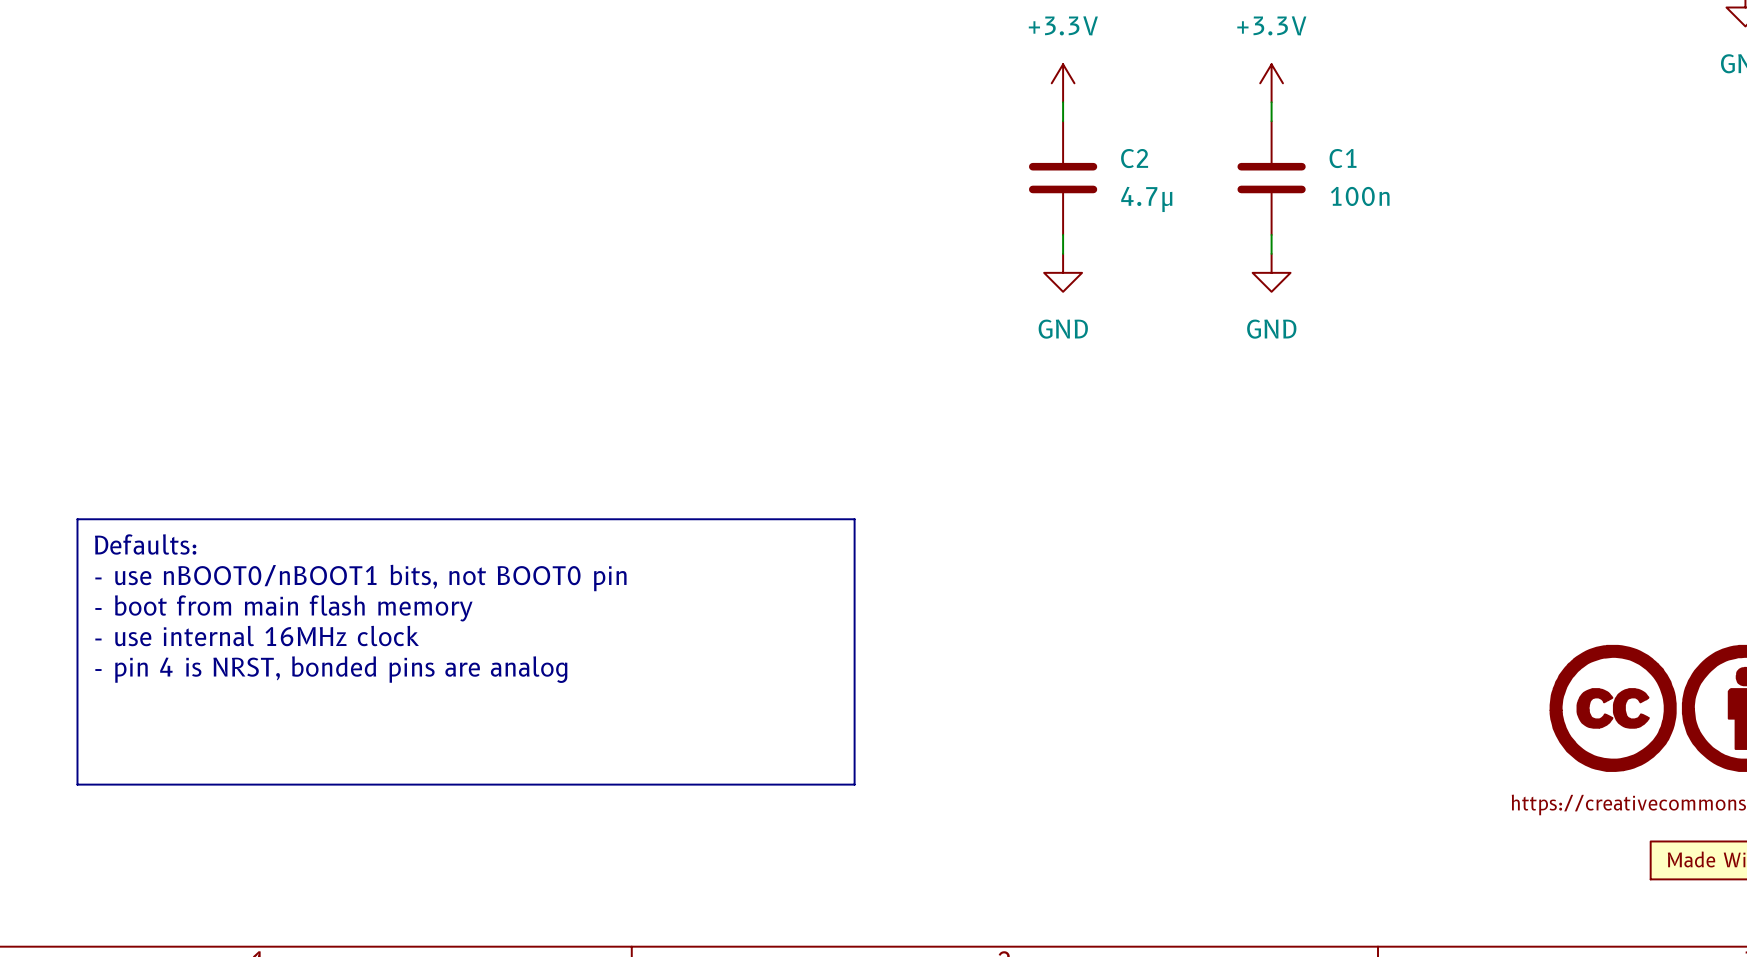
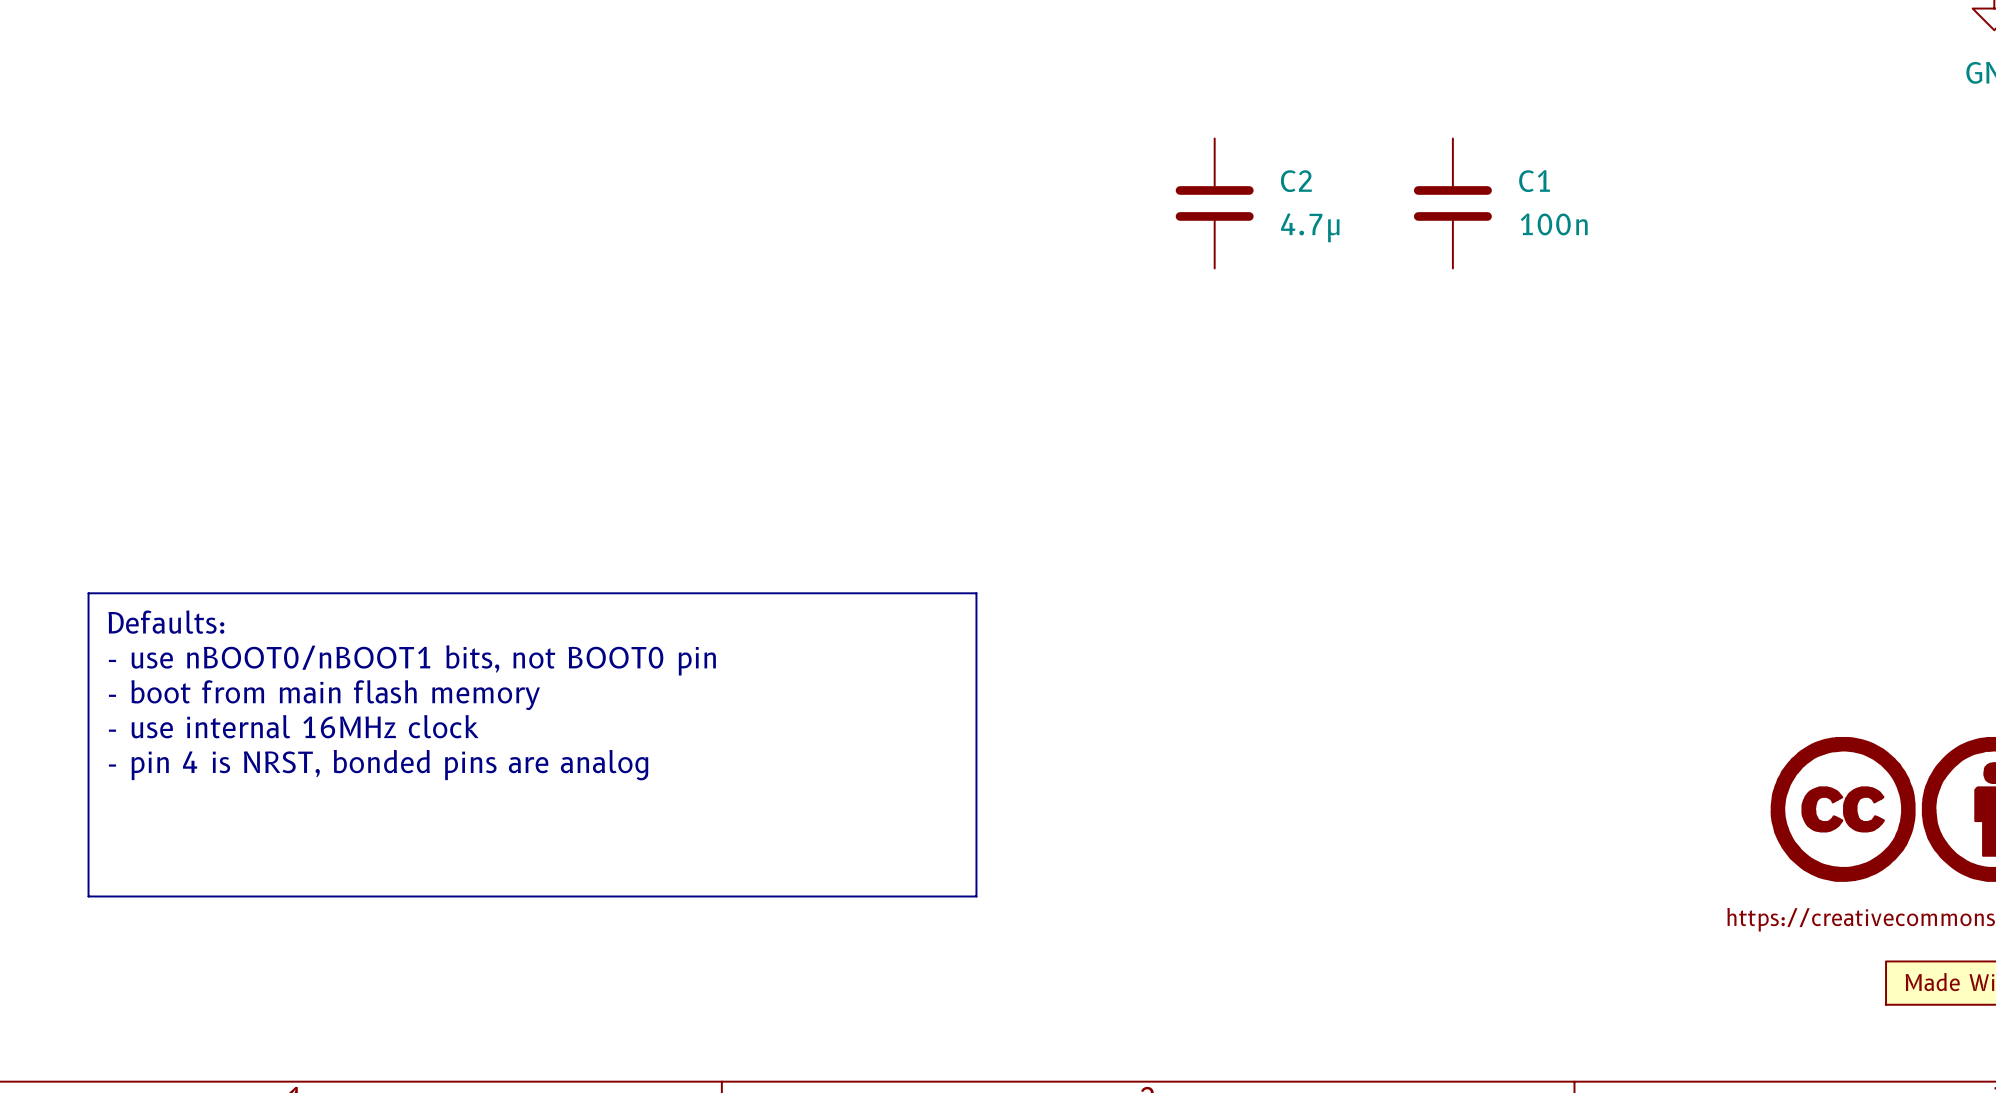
power symbol: +3.3V (1063, 83) -> none
power symbol: +3.3V (1271, 83) -> none
wire: (1063, 102) (1063, 121) -> none
wire: (1271, 102) (1271, 121) -> none
wire: (1063, 234) (1063, 253) -> none
wire: (1271, 234) (1271, 253) -> none
power symbol: GND (1063, 272) -> none
power symbol: GND (1271, 272) -> none

